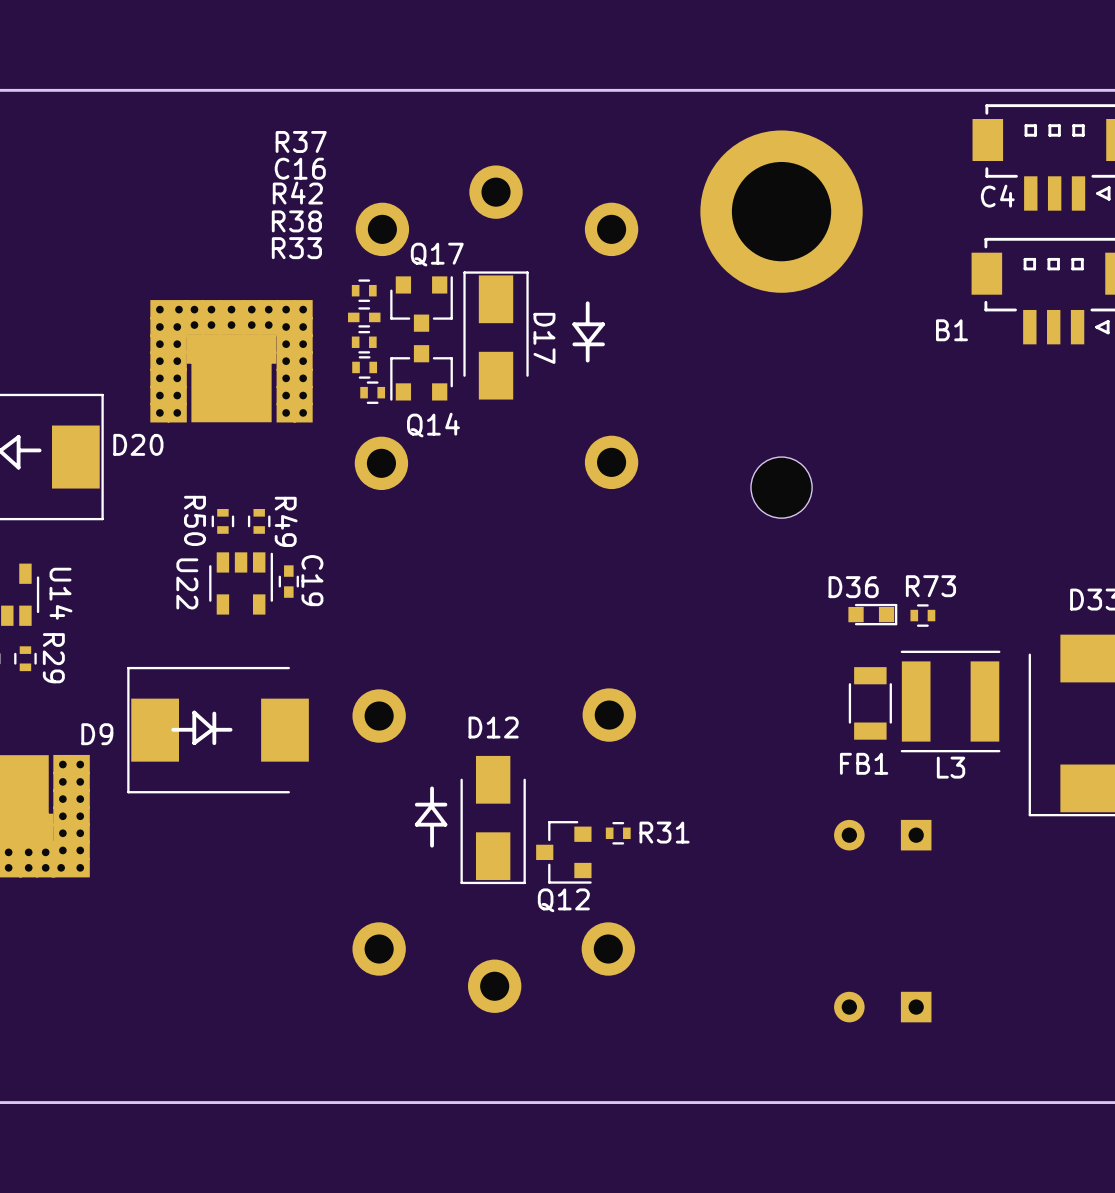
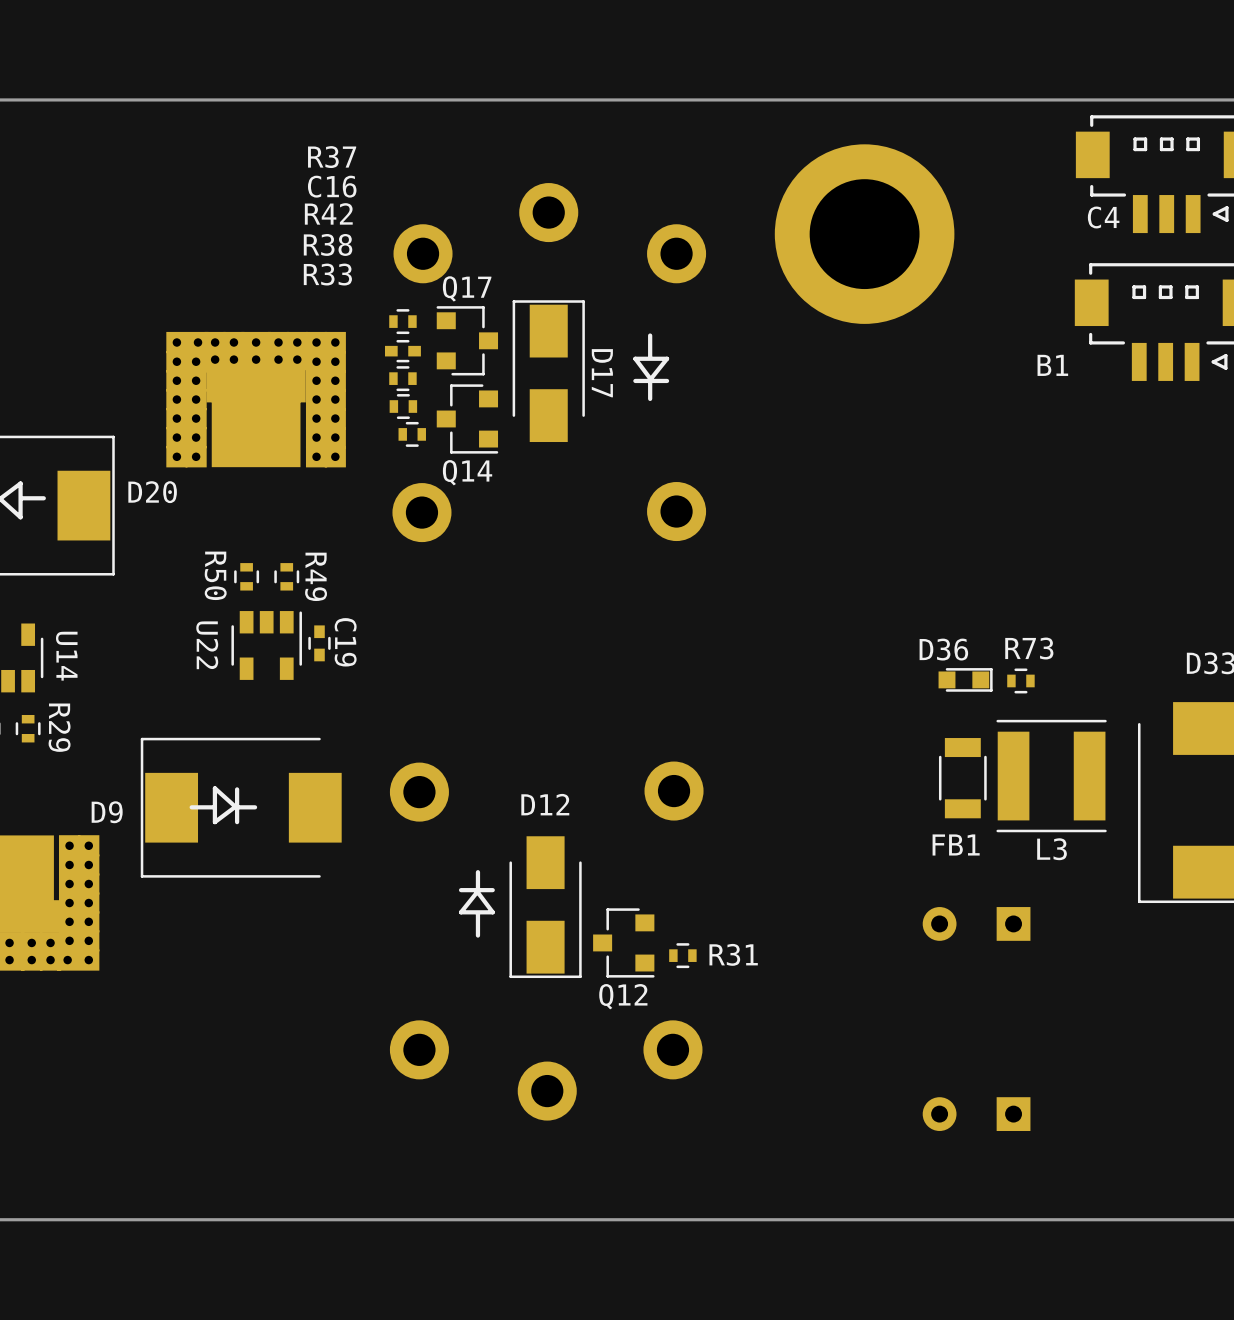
Q17 rotation: 0° (421, 303) -> 90° counterclockwise (467, 340)
Q14 rotation: 0° (421, 372) -> 90° counterclockwise (467, 418)
part: (781, 487) -> none
R31 position: (618, 833) -> (682, 955)

